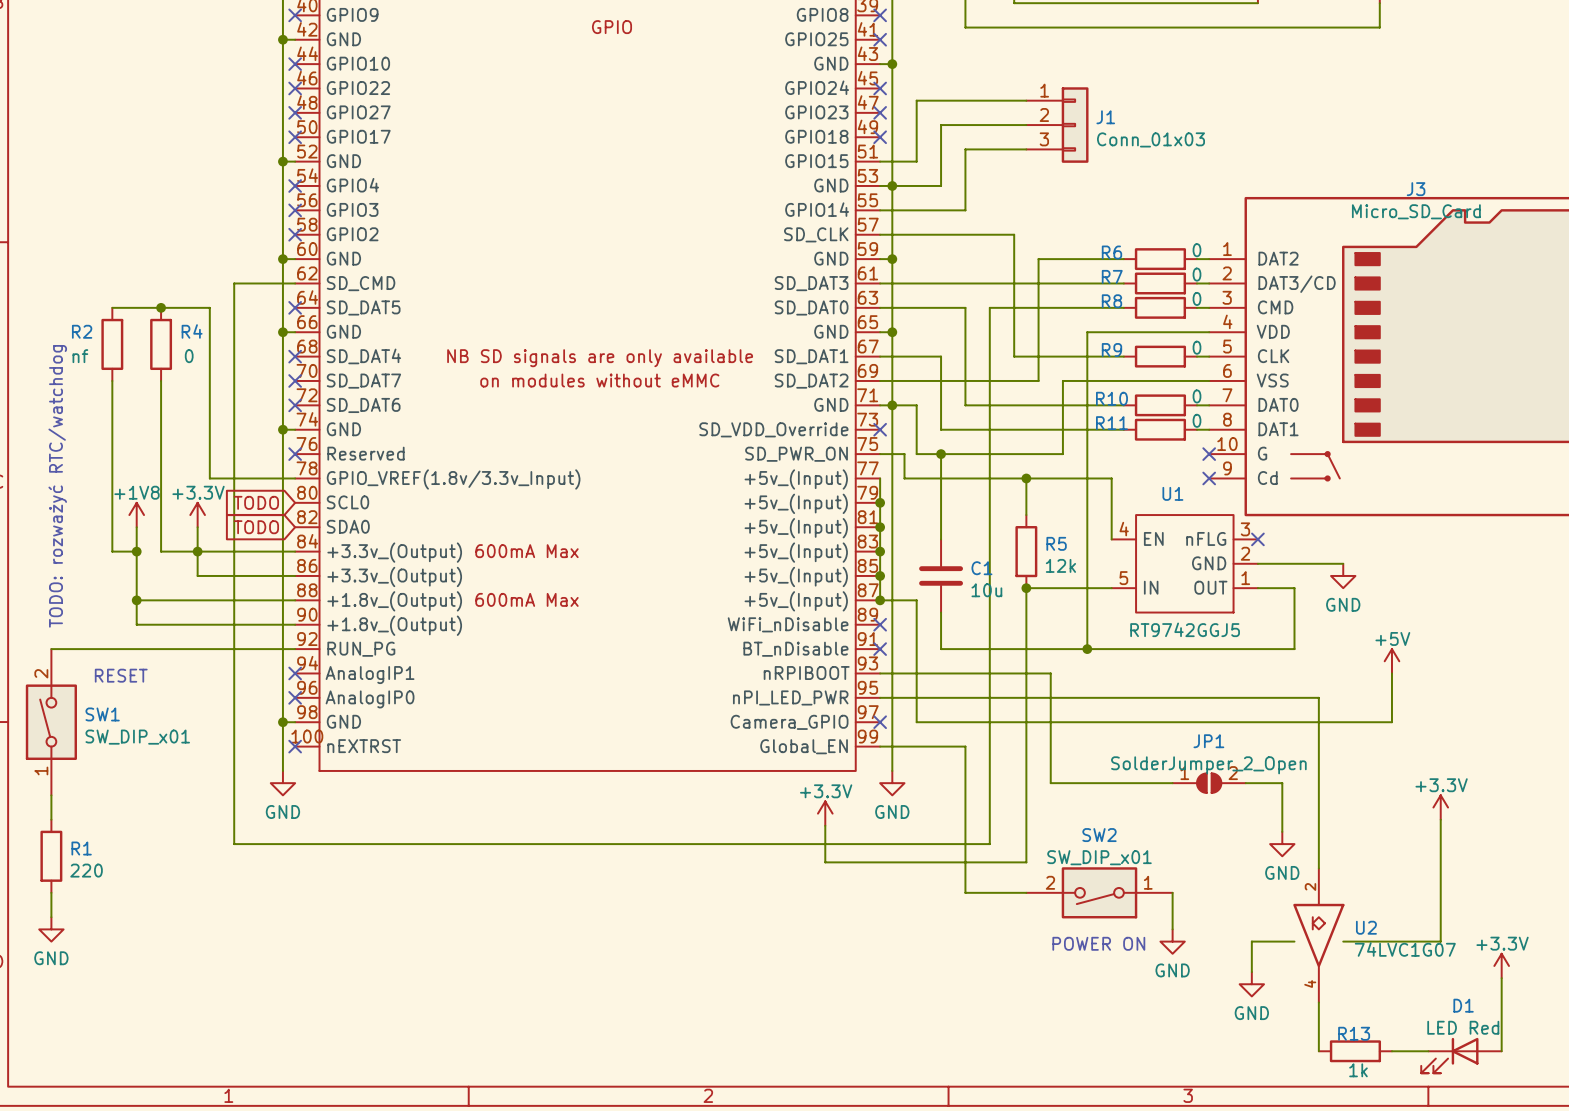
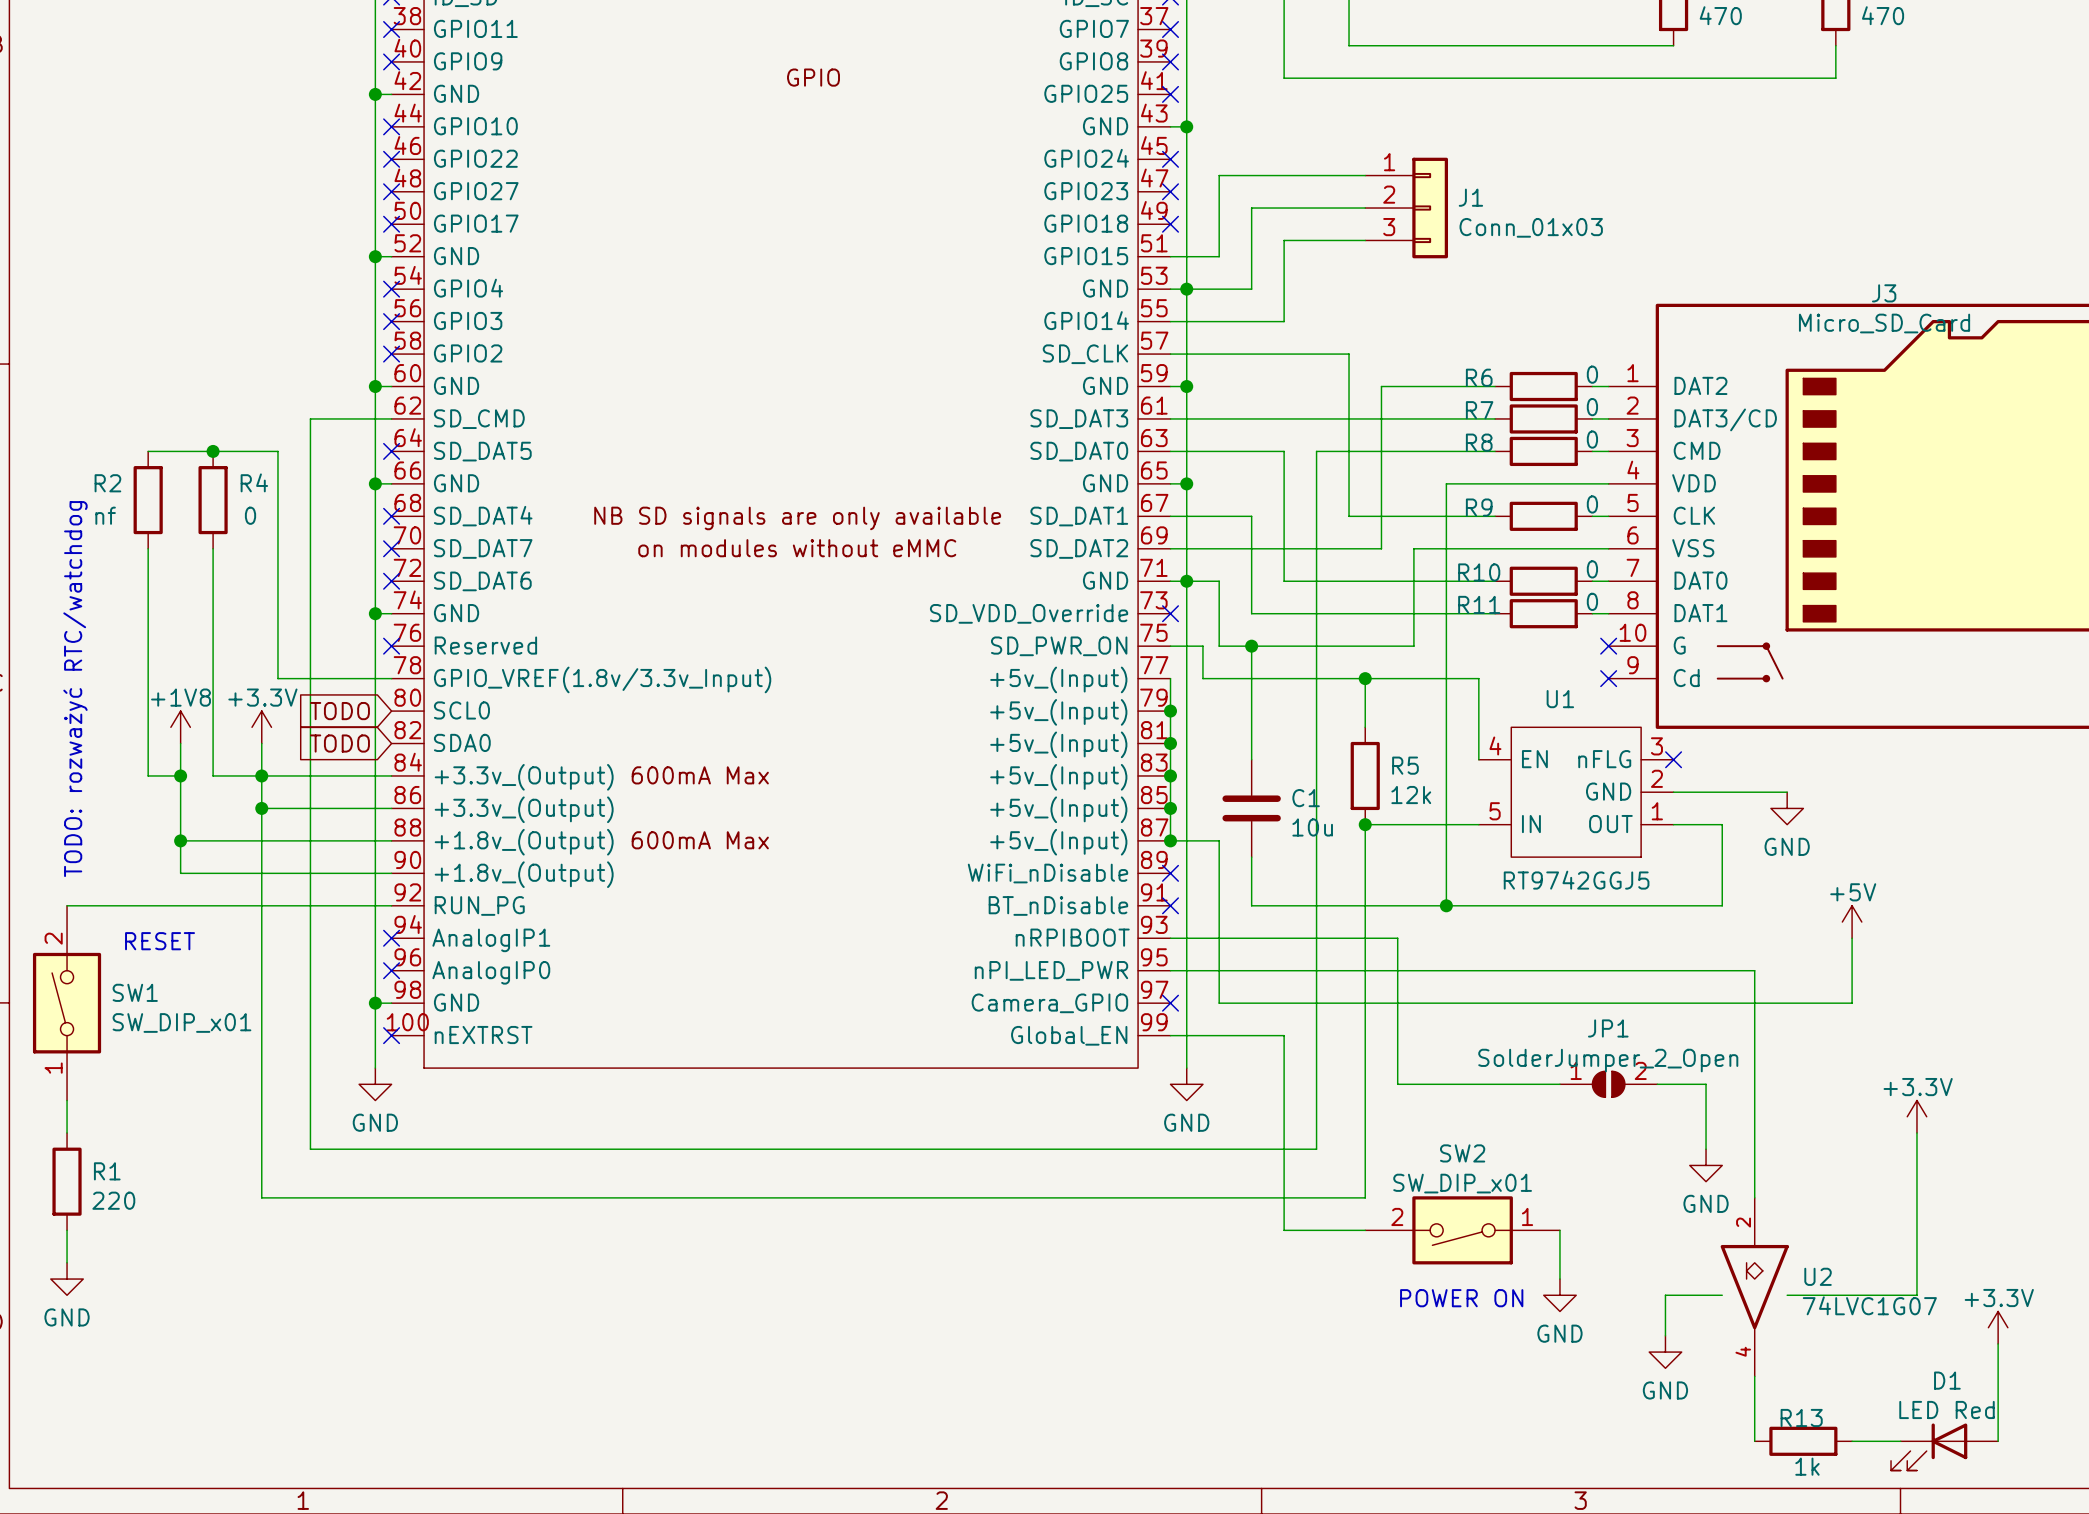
junction: none -> (261, 808)
power symbol: +3.3V (825, 813) -> none
wire: (825, 825) (825, 862) (1026, 862) -> (261, 808) (261, 1197) (1365, 1197) (1365, 1189)
wire: (234, 831) (234, 844) (989, 844) (989, 831) -> (310, 1149) (1316, 1149)

